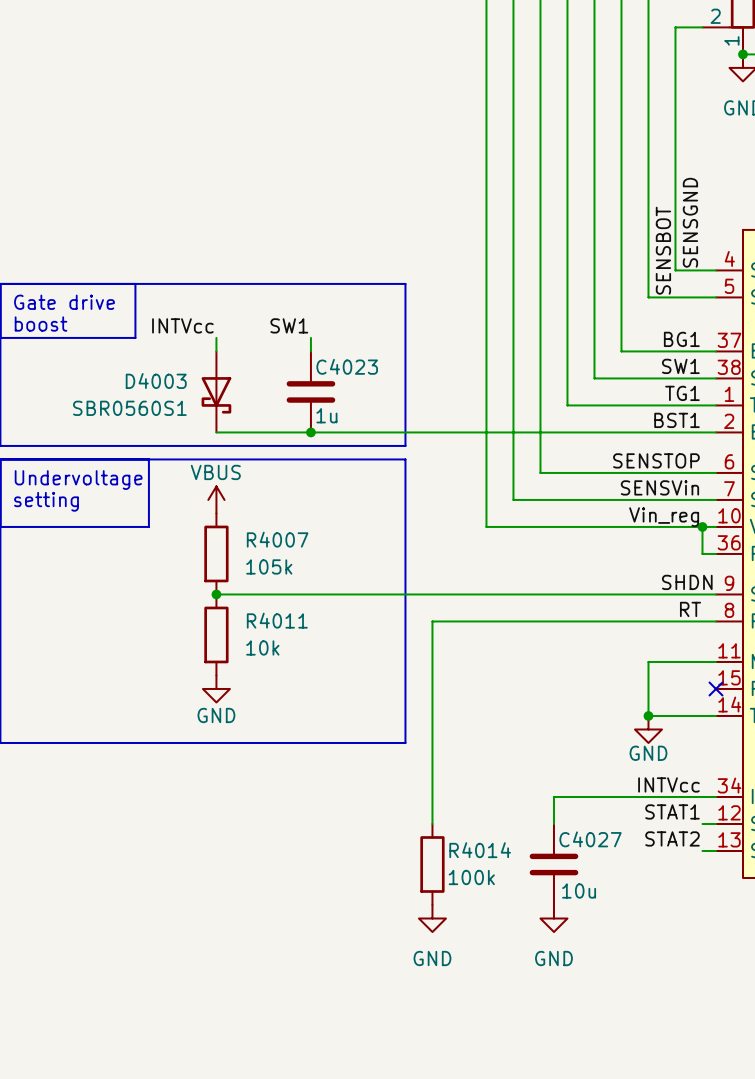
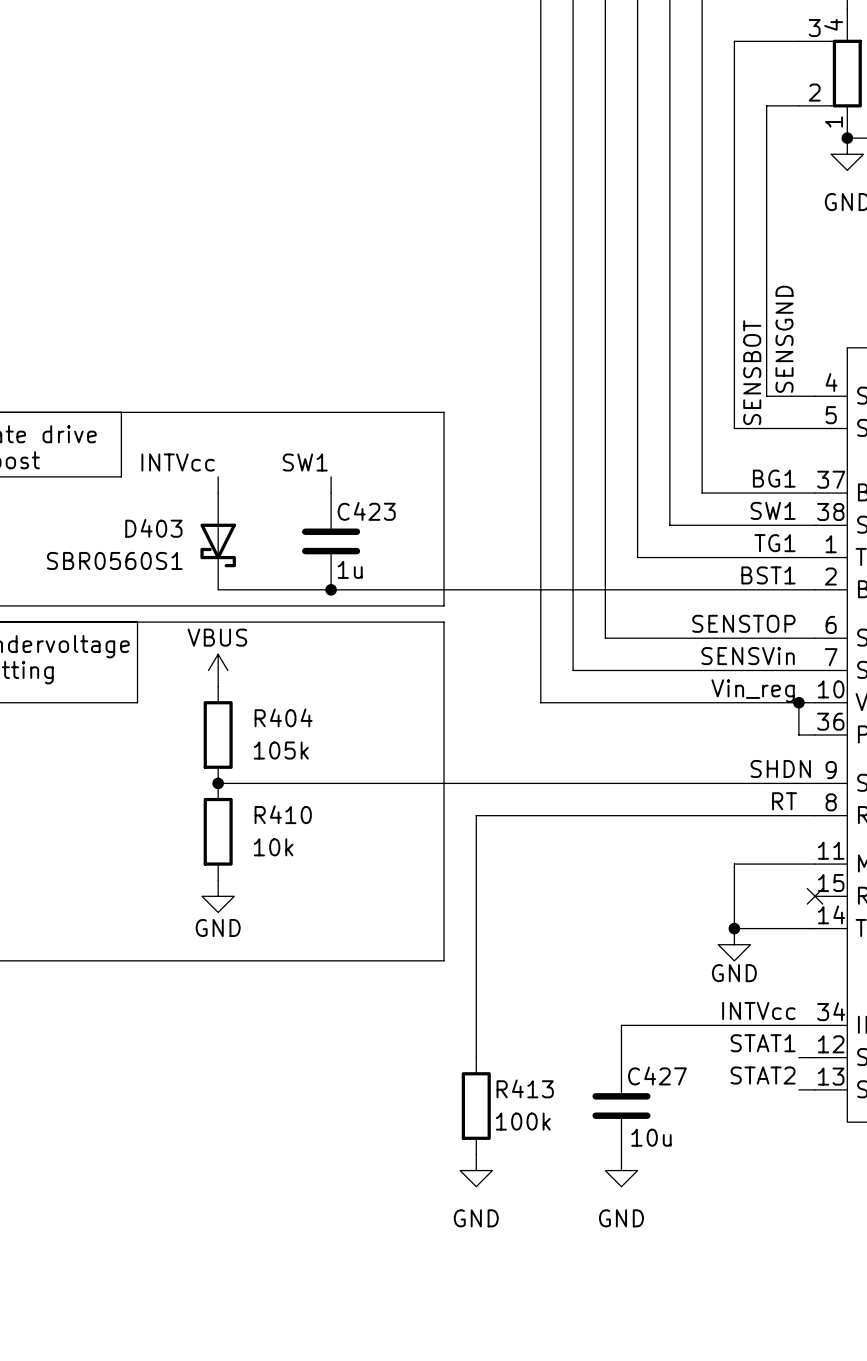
C4023 name: C4023 (347, 366) -> C423 (366, 511)
D4003 name: D4003 (156, 380) -> D403 (153, 528)
R4007 name: R4007 (277, 539) -> R404 (283, 717)
R4011 name: R4011 (277, 620) -> R410 (283, 814)
C4027 name: C4027 (590, 839) -> C427 (657, 1076)
R4014 name: R4014 (480, 850) -> R413 (525, 1088)

